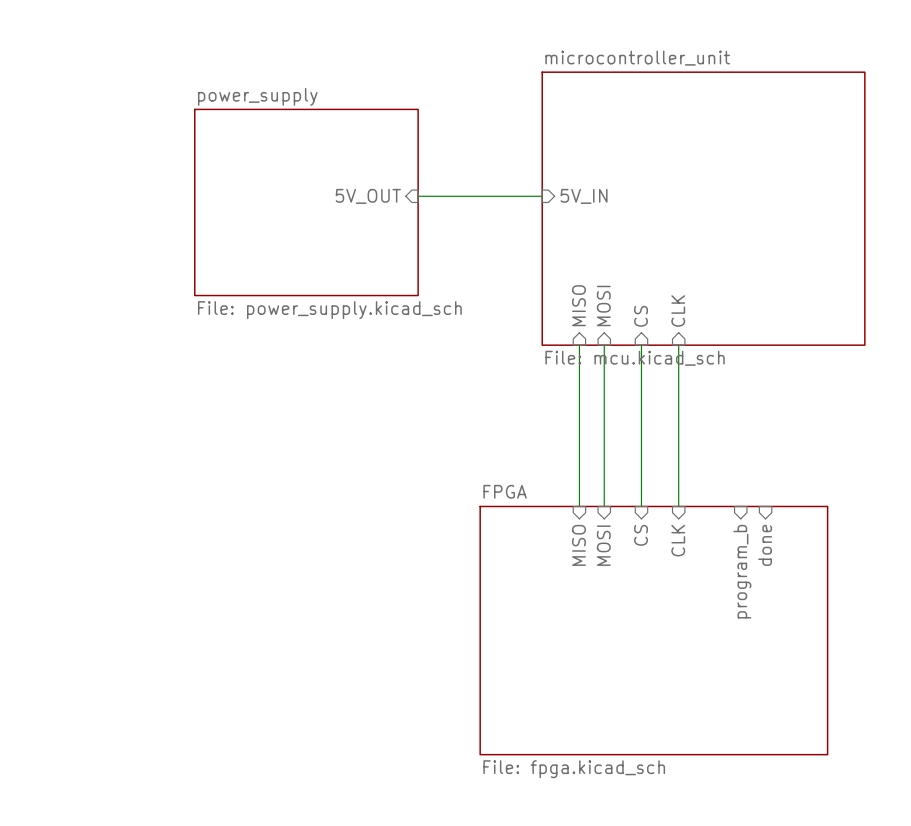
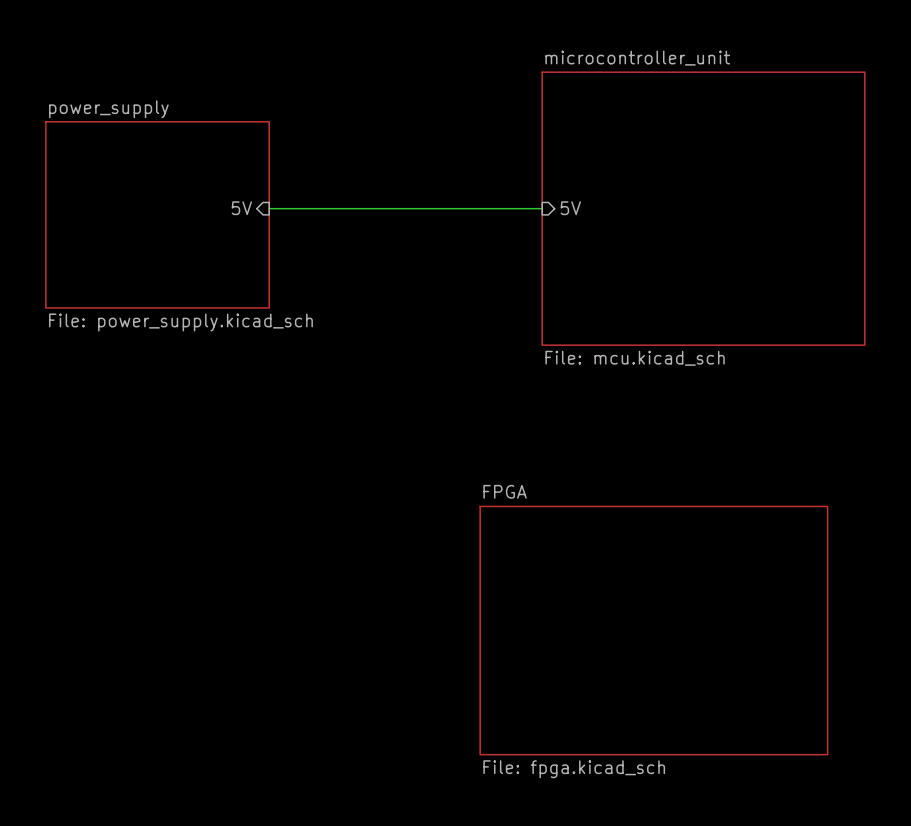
sheet pin: 5V_OUT (368, 196) -> none
wire: (418, 196) (542, 196) -> none
sheet pin: 5V_IN (584, 196) -> none
sheet power_supply position: (306, 202) -> (157, 214)
sheet pin: none -> 5V (241, 208)
wire: none -> (269, 208) (542, 208)
sheet pin: none -> 5V (570, 208)
sheet pin: MISO (578, 305) -> none
sheet pin: MOSI (603, 305) -> none
sheet pin: CLK (678, 311) -> none
sheet pin: CS (641, 316) -> none
wire: (579, 345) (579, 506) -> none
wire: (604, 345) (604, 506) -> none
wire: (641, 345) (641, 506) -> none
wire: (678, 345) (678, 506) -> none
sheet pin: CS (641, 535) -> none
sheet pin: CLK (678, 540) -> none
sheet pin: MISO (578, 545) -> none
sheet pin: MOSI (603, 545) -> none
sheet pin: done (765, 545) -> none
sheet pin: program_b (742, 571) -> none

